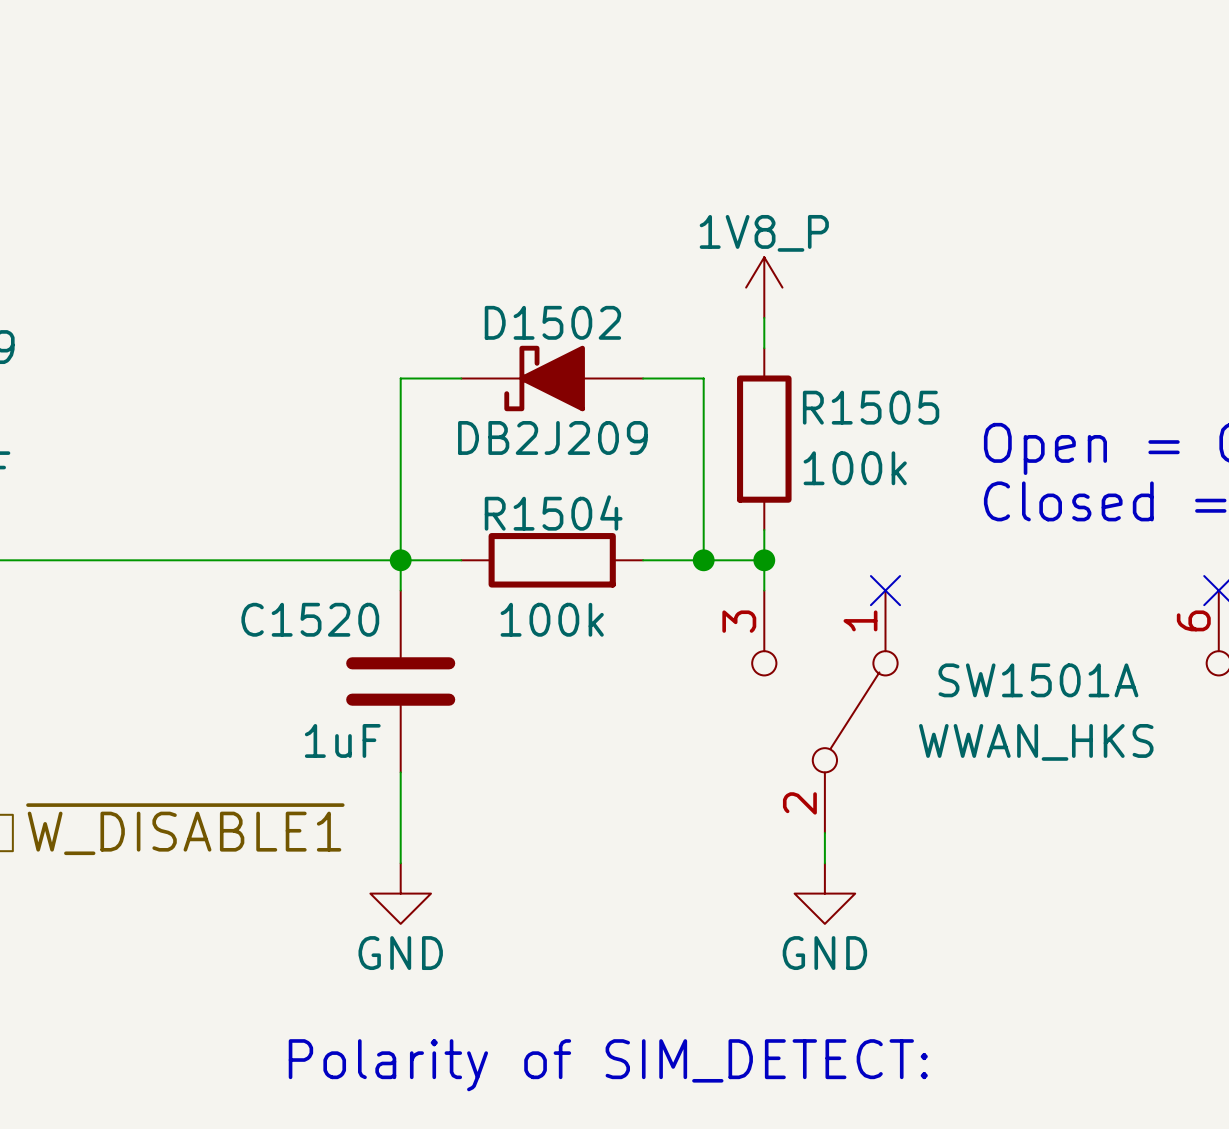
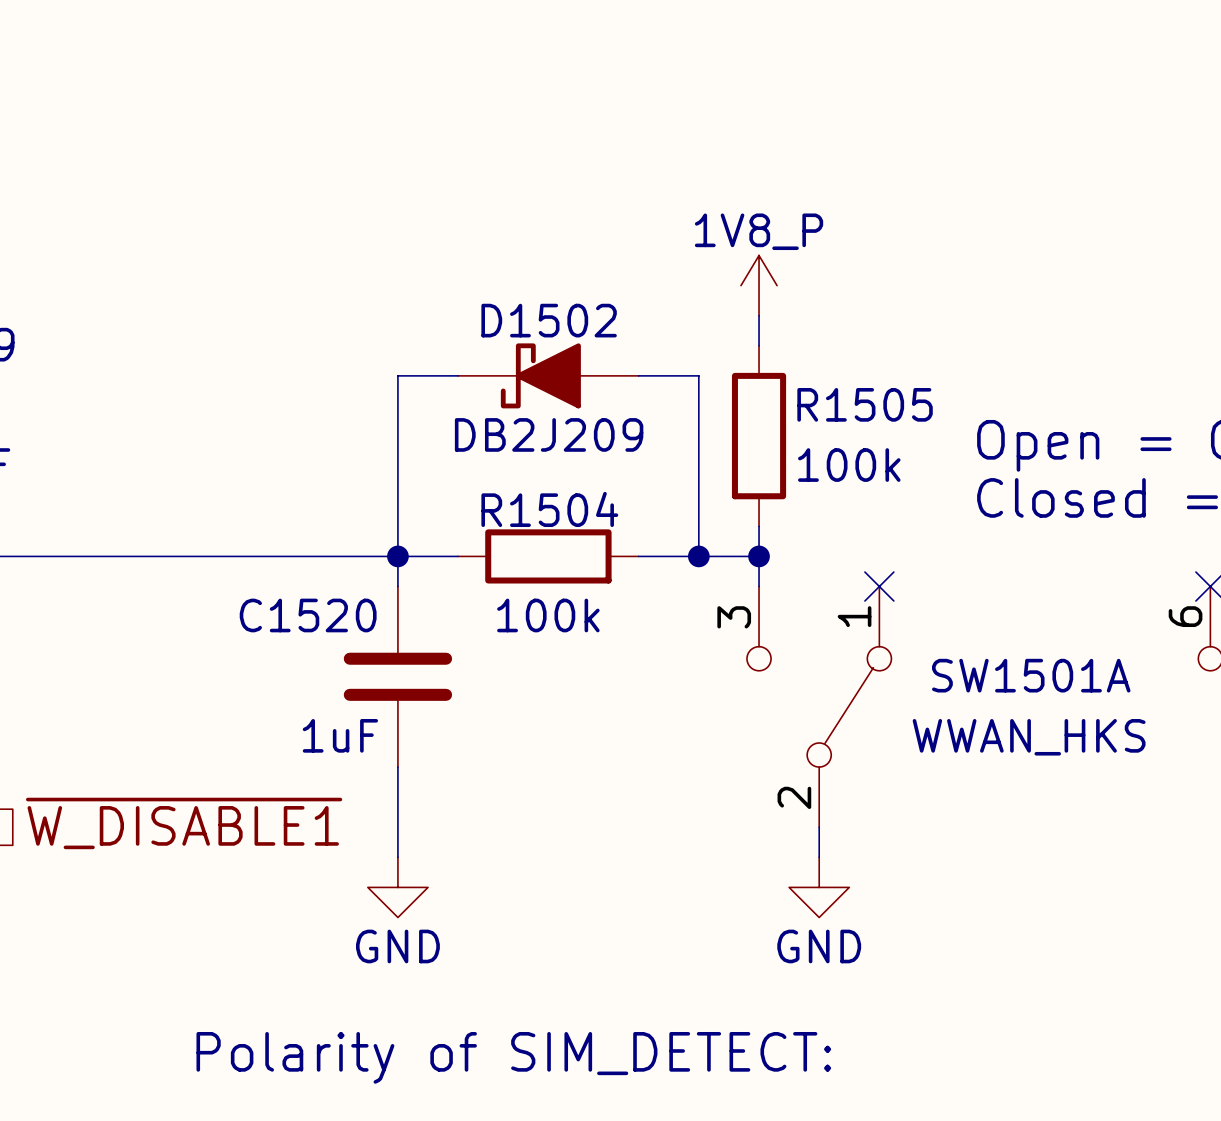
text position: Polarity of SIM_DETECT: (608, 1065) -> Polarity of SIM_DETECT: (513, 1057)

